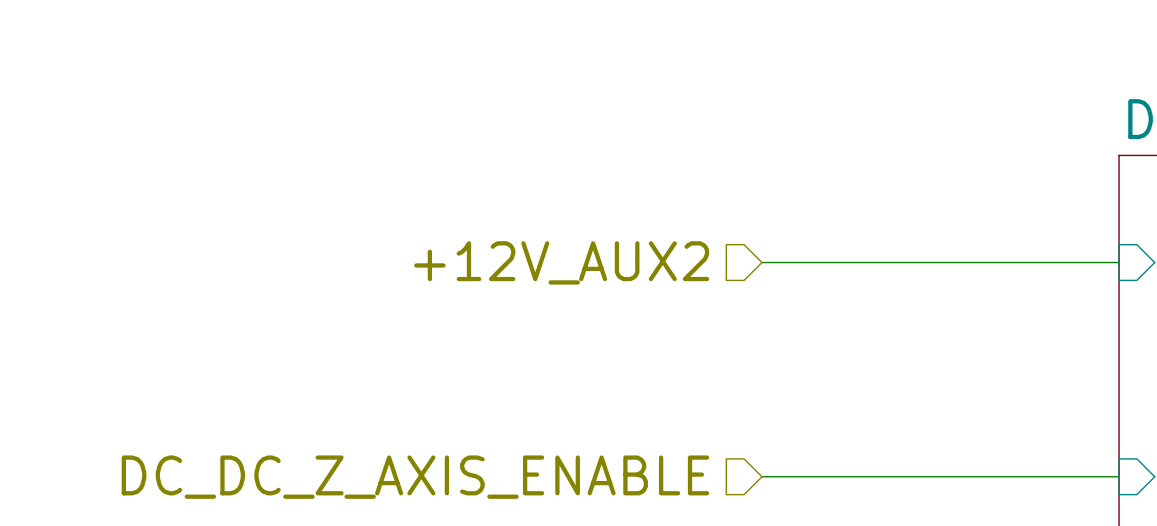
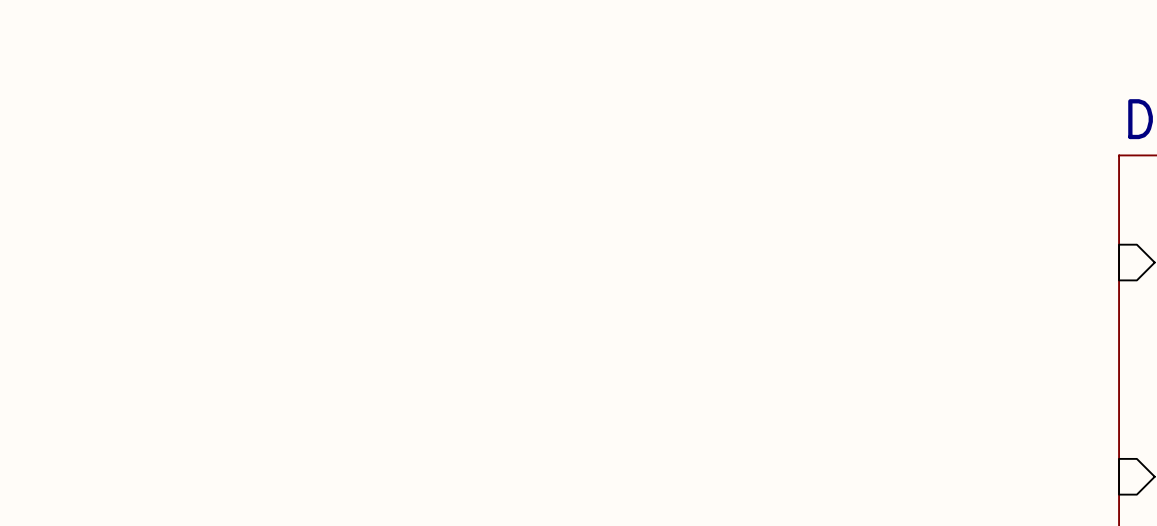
hierarchical label: +12V_AUX2 (561, 262) -> none
wire: (761, 262) (1119, 262) -> none
wire: (761, 476) (1119, 476) -> none
hierarchical label: DC_DC_Z_AXIS_ENABLE (415, 477) -> none

